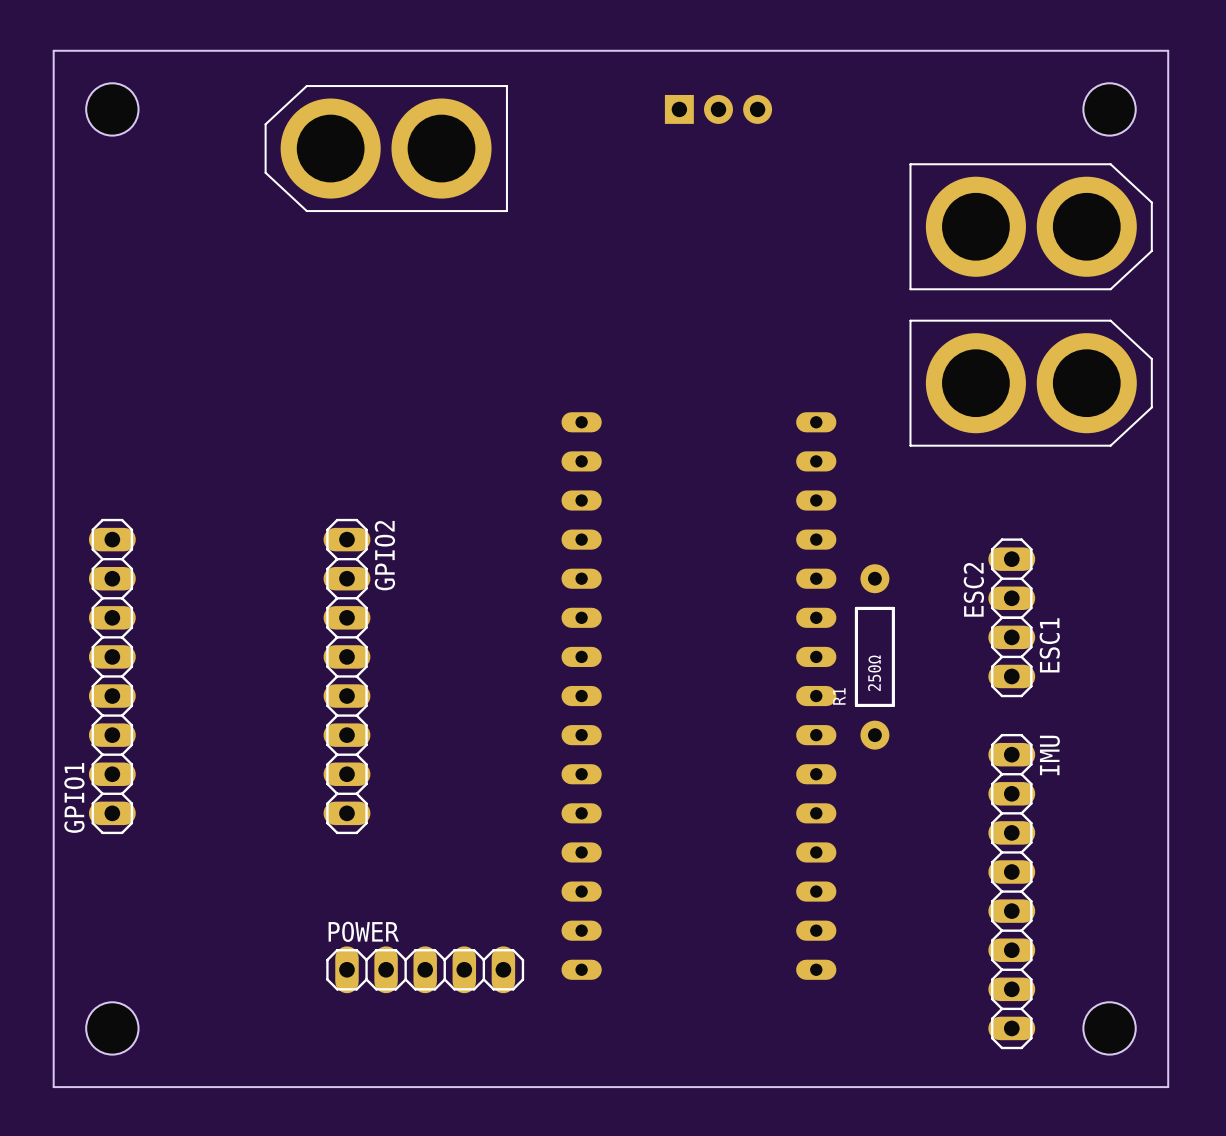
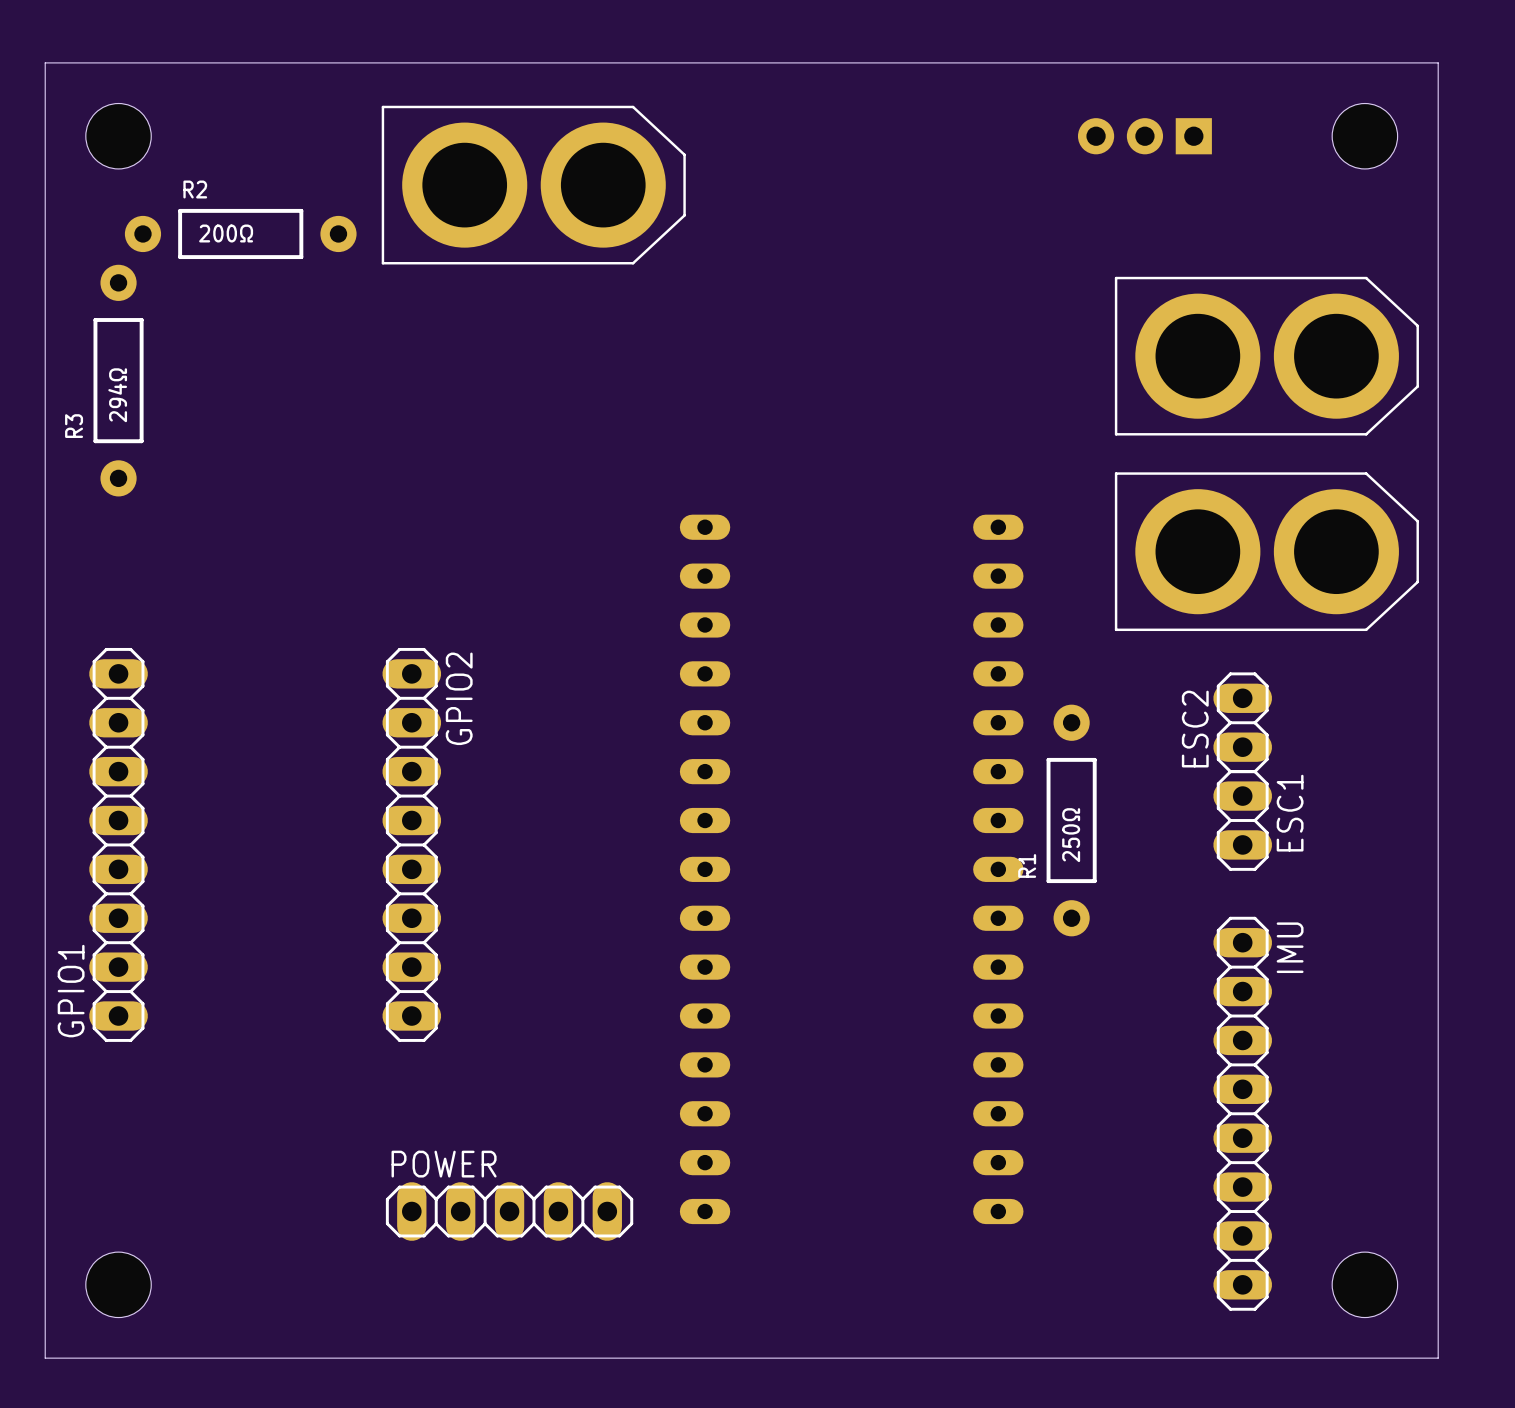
part rotation: 0° (718, 109) -> 180° (1144, 136)
part position: (718, 109) -> (1144, 136)
part rotation: 0° (386, 148) -> 180° (533, 185)
R2: none -> 200Ω (240, 233)
part: (1031, 226) -> none
part: none -> (1266, 356)
R3: none -> 294Ω (118, 380)
part: (1031, 383) -> none
part: none -> (1266, 551)

